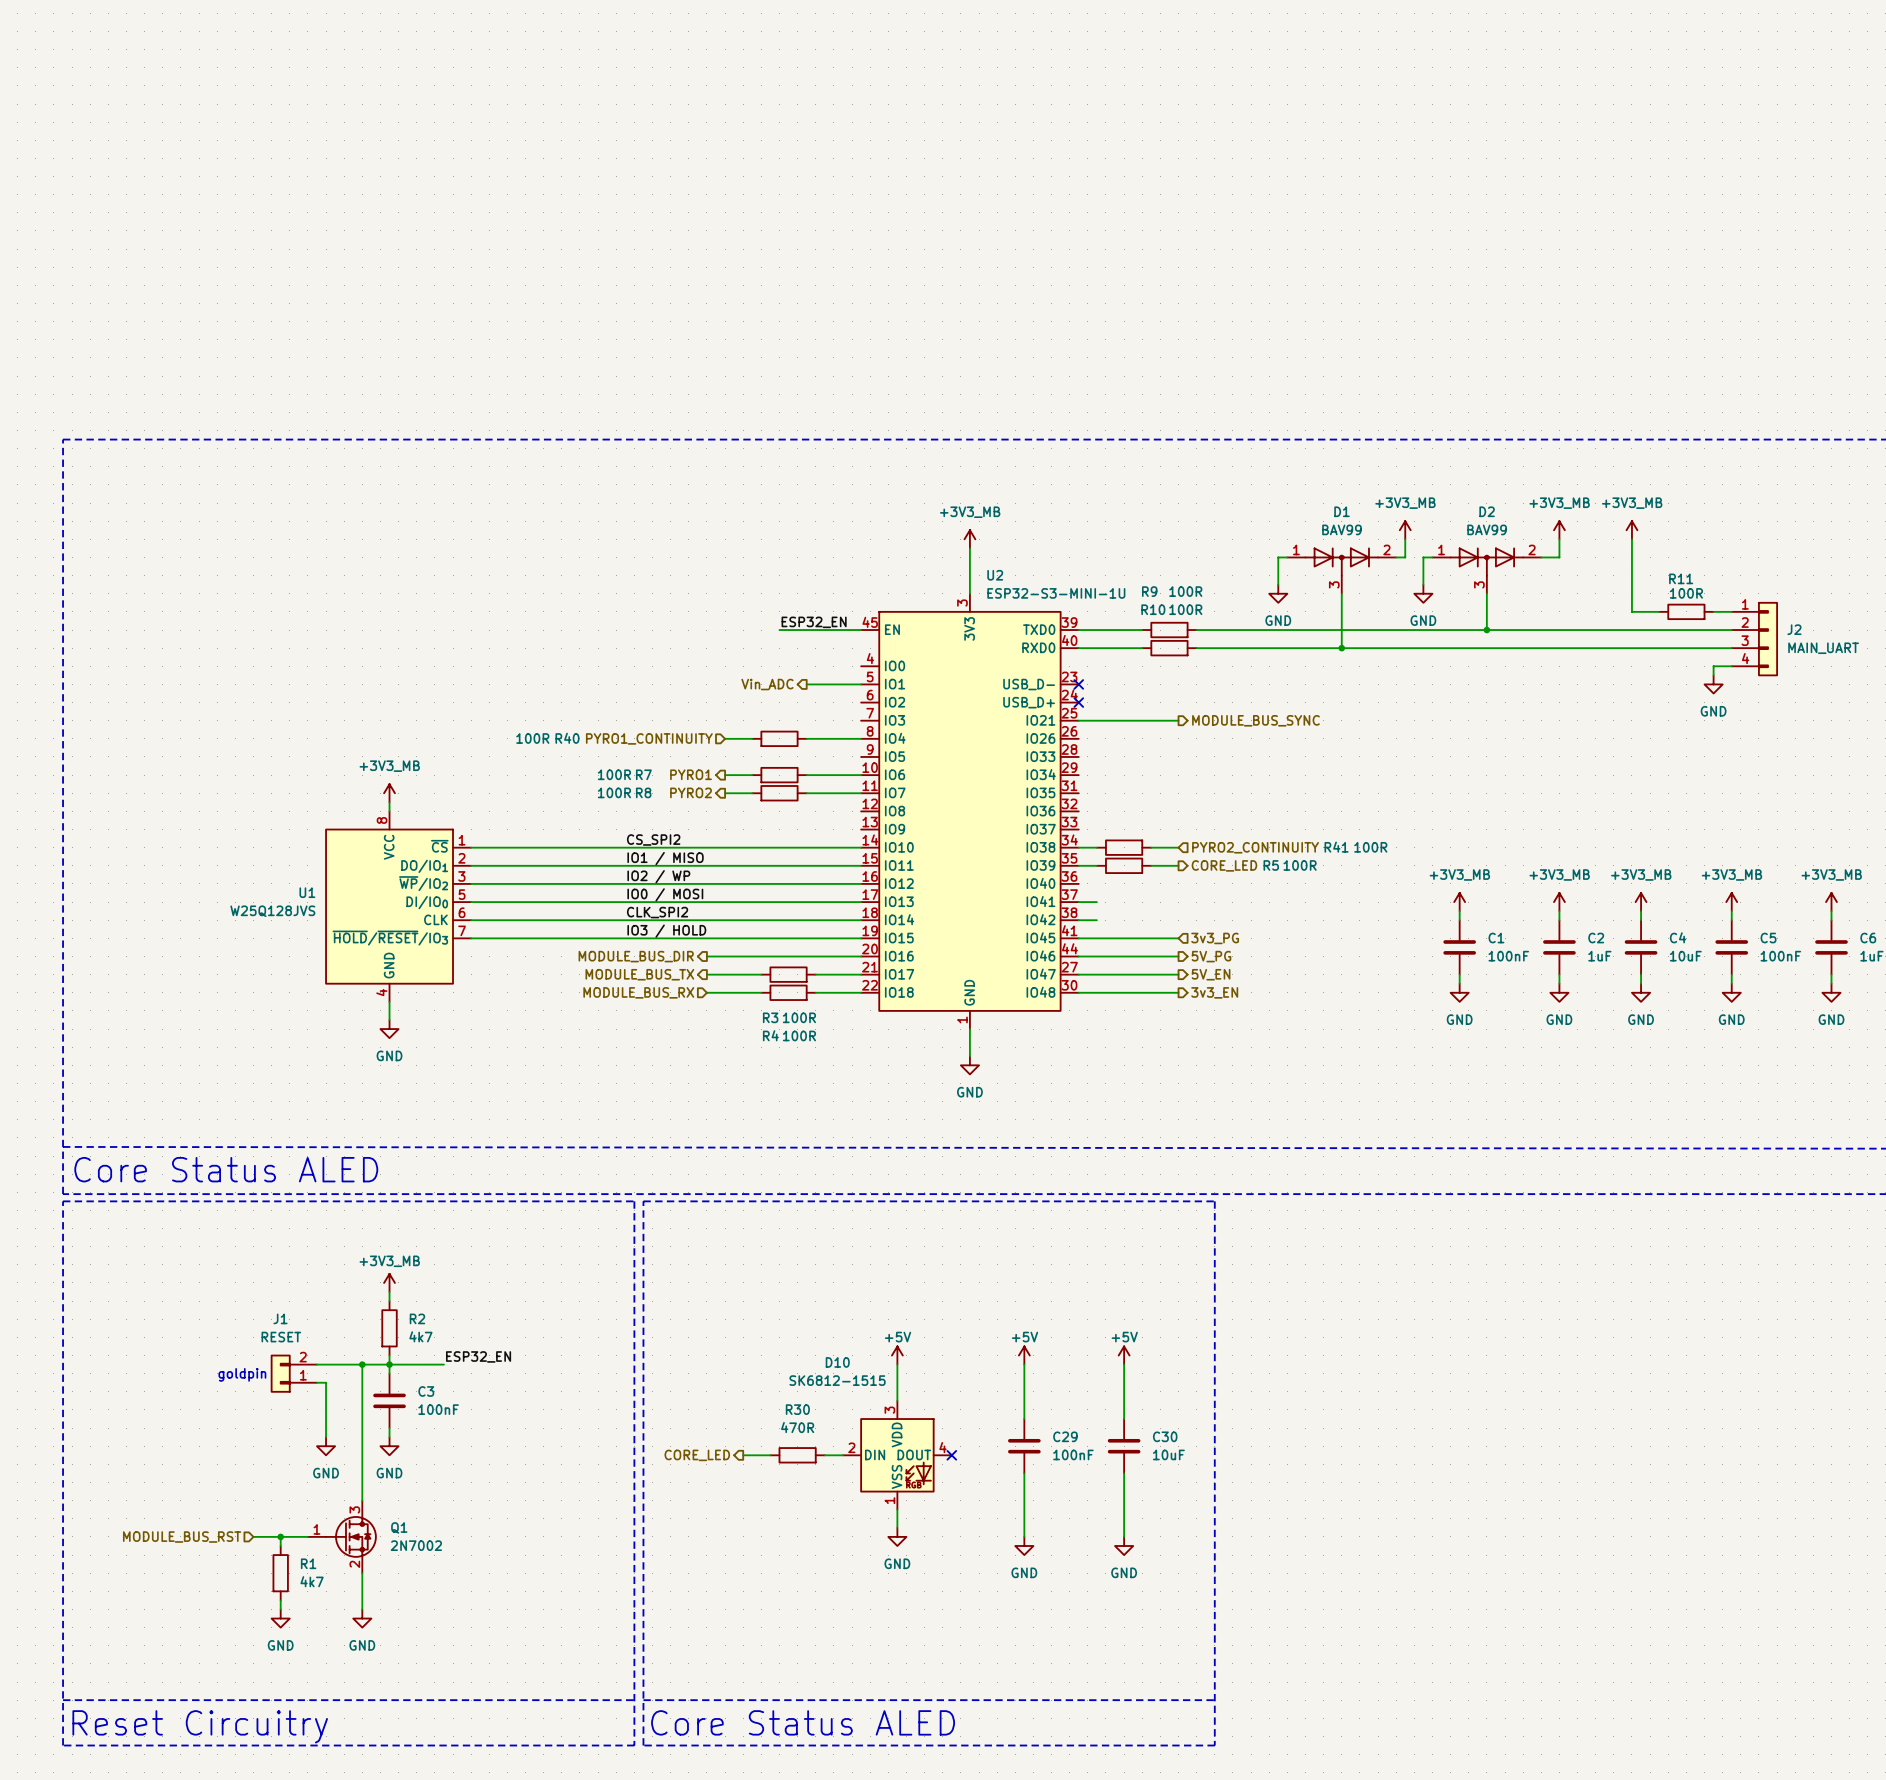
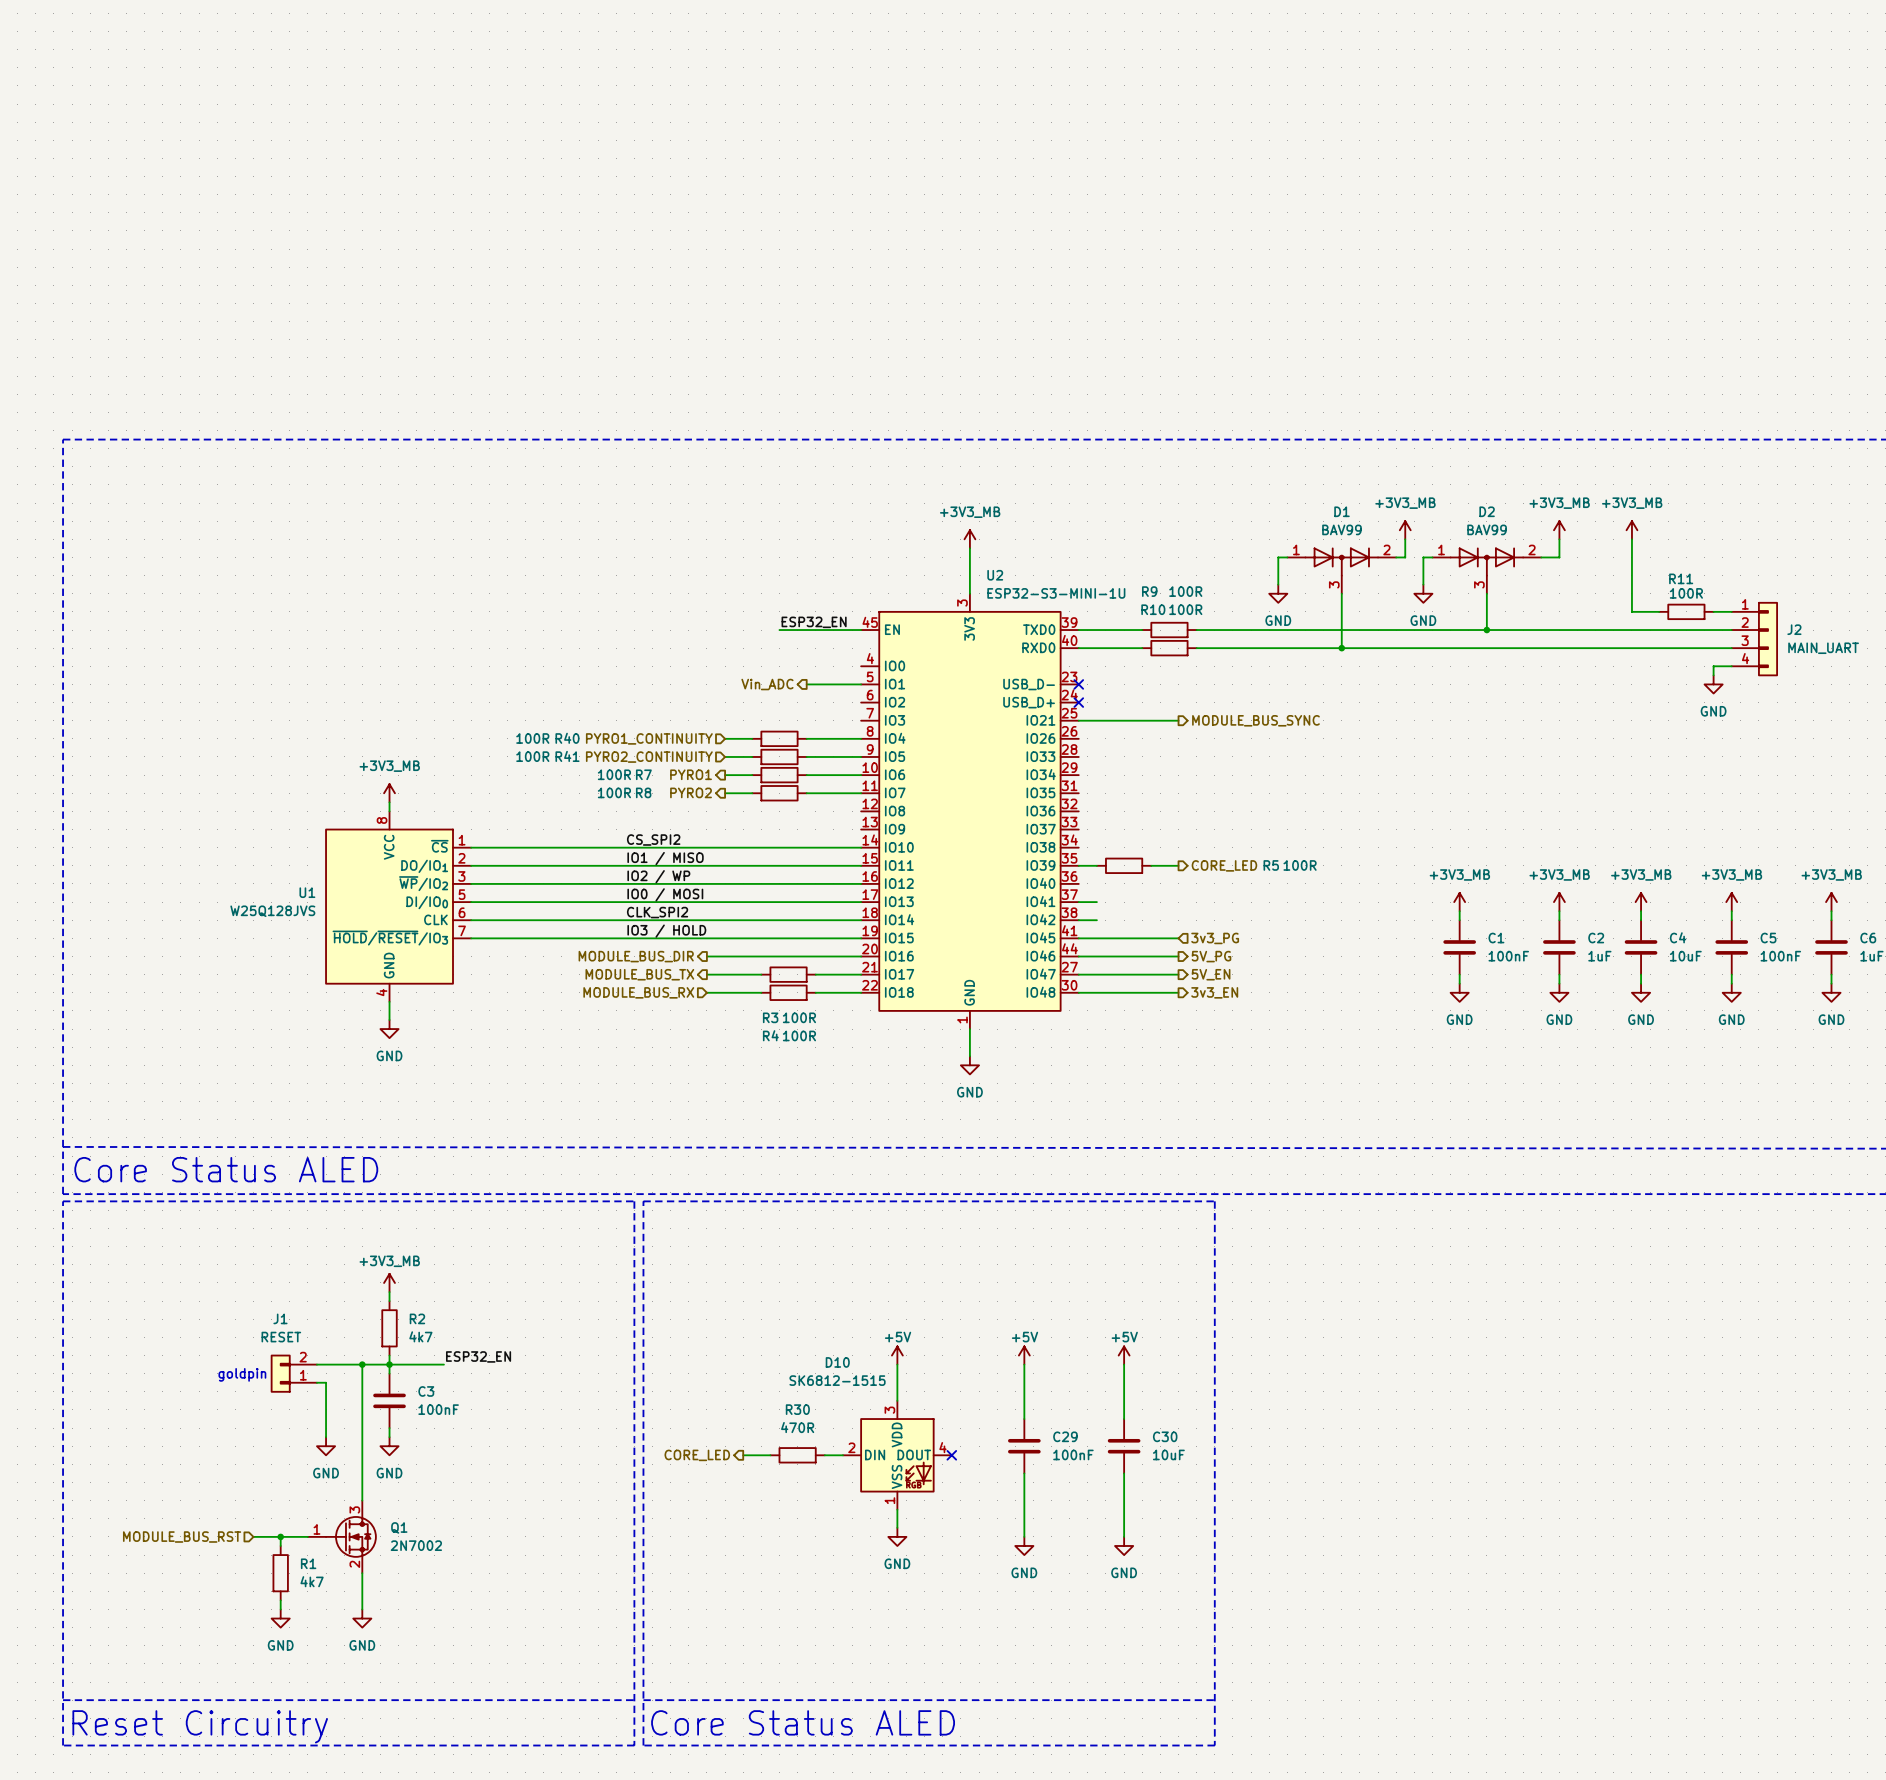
wire: none -> (725, 756) (752, 756)
wire: none -> (806, 756) (861, 756)
hierarchical label: none -> PYRO2_CONTINUITY (649, 757)
wire: (1078, 847) (1096, 847) -> none
R41 position: (1124, 847) -> (779, 756)
wire: (1151, 847) (1178, 847) -> none
hierarchical label: PYRO2_CONTINUITY (1255, 847) -> none
R41 name position: R41 (1336, 847) -> R41 (567, 756)
R41 value position: 100R (1370, 847) -> 100R (532, 756)

